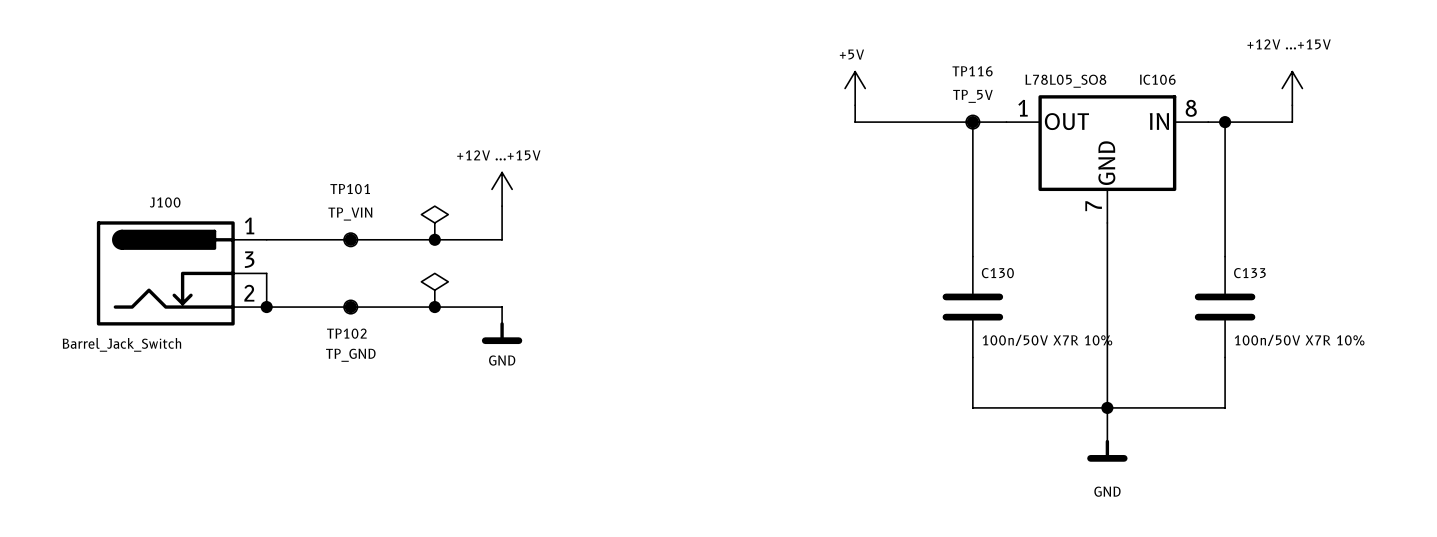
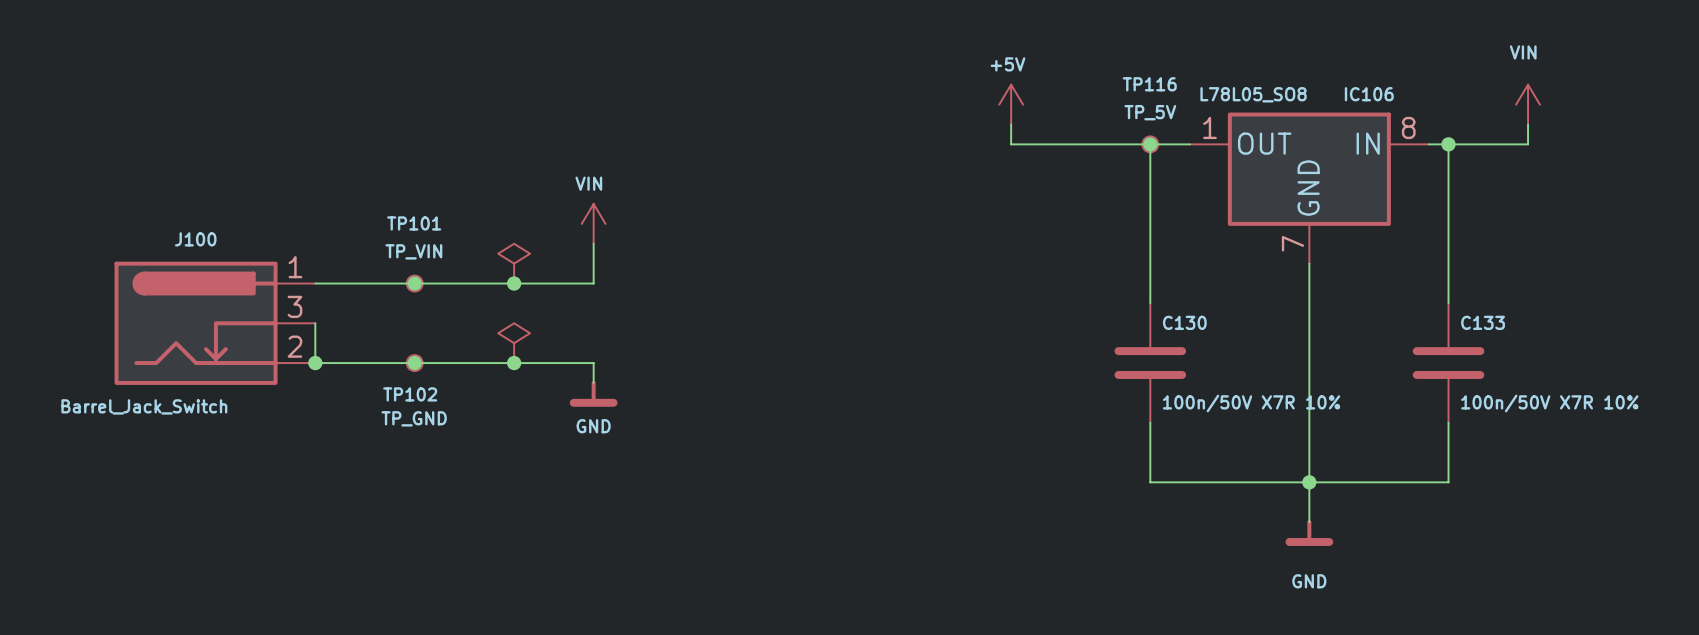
power symbol: +12V ...+15V (1292, 88) -> VIN (1528, 104)
power symbol: +12V ...+15V (502, 189) -> VIN (593, 223)

